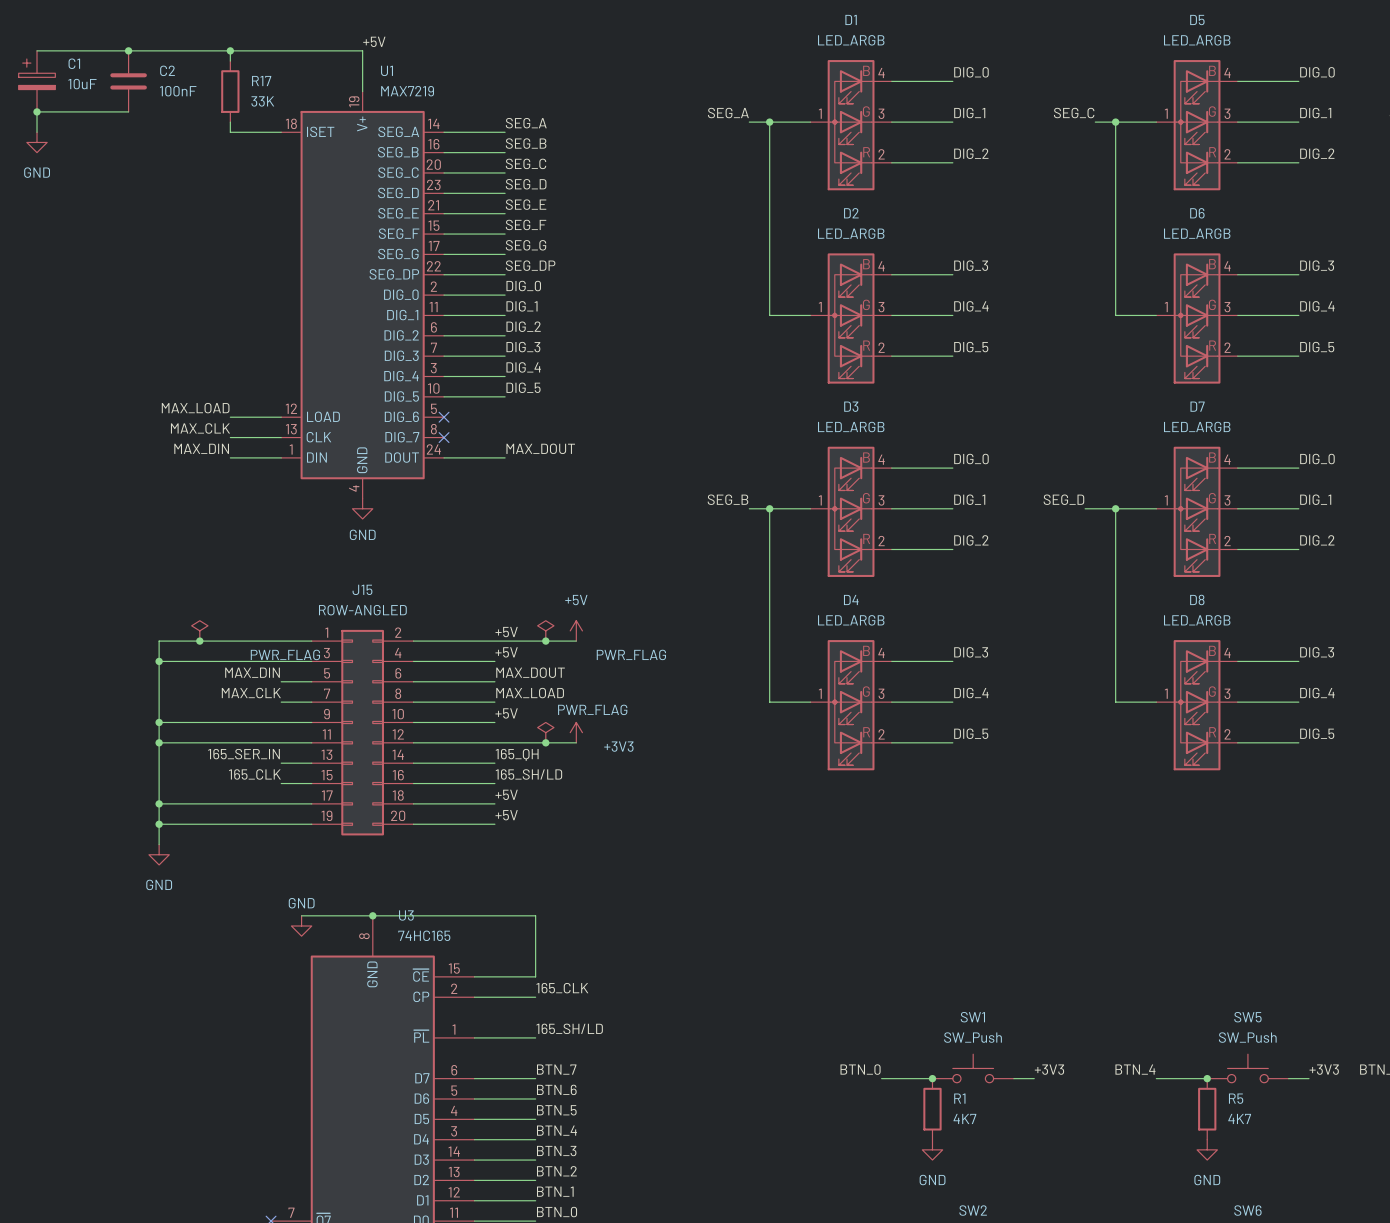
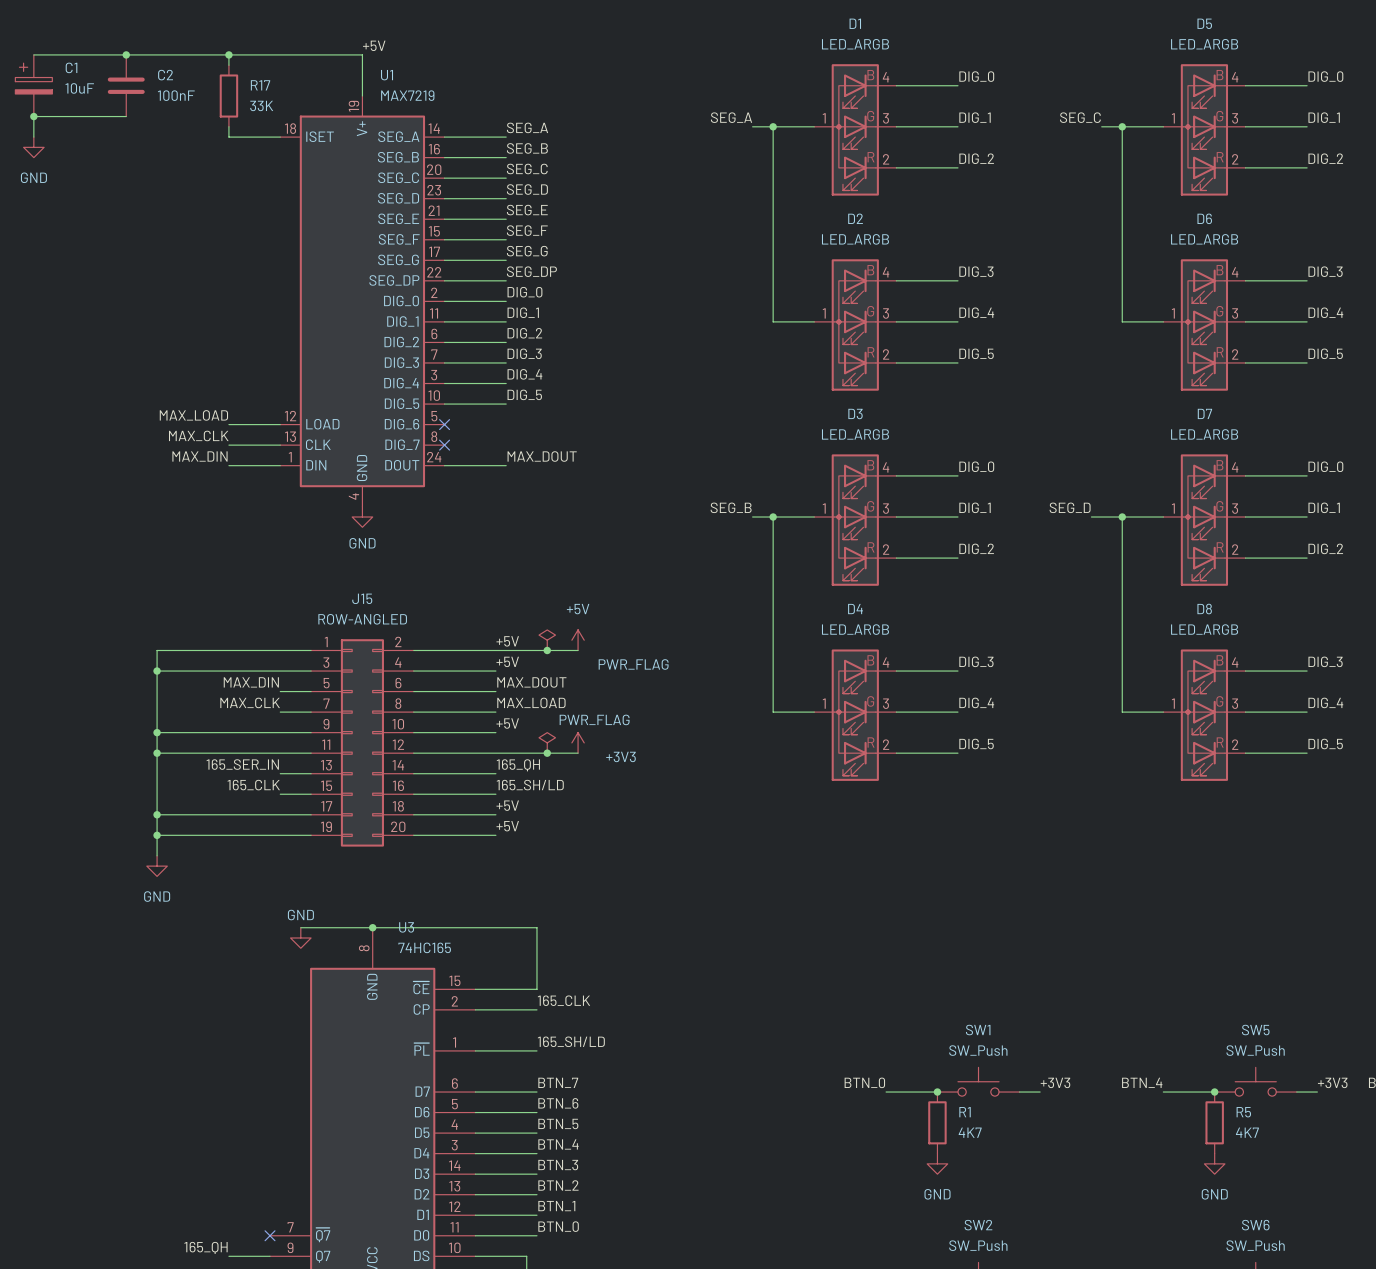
power symbol: PWR_FLAG (199, 630) -> none
junction: (199, 641) -> none

